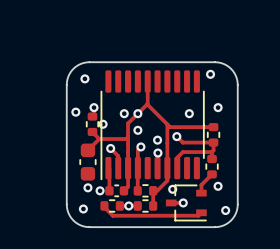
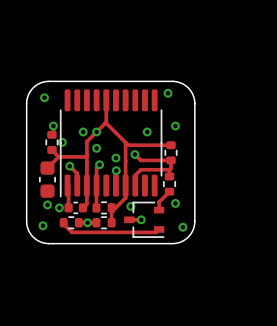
via: (75, 112) -> none

